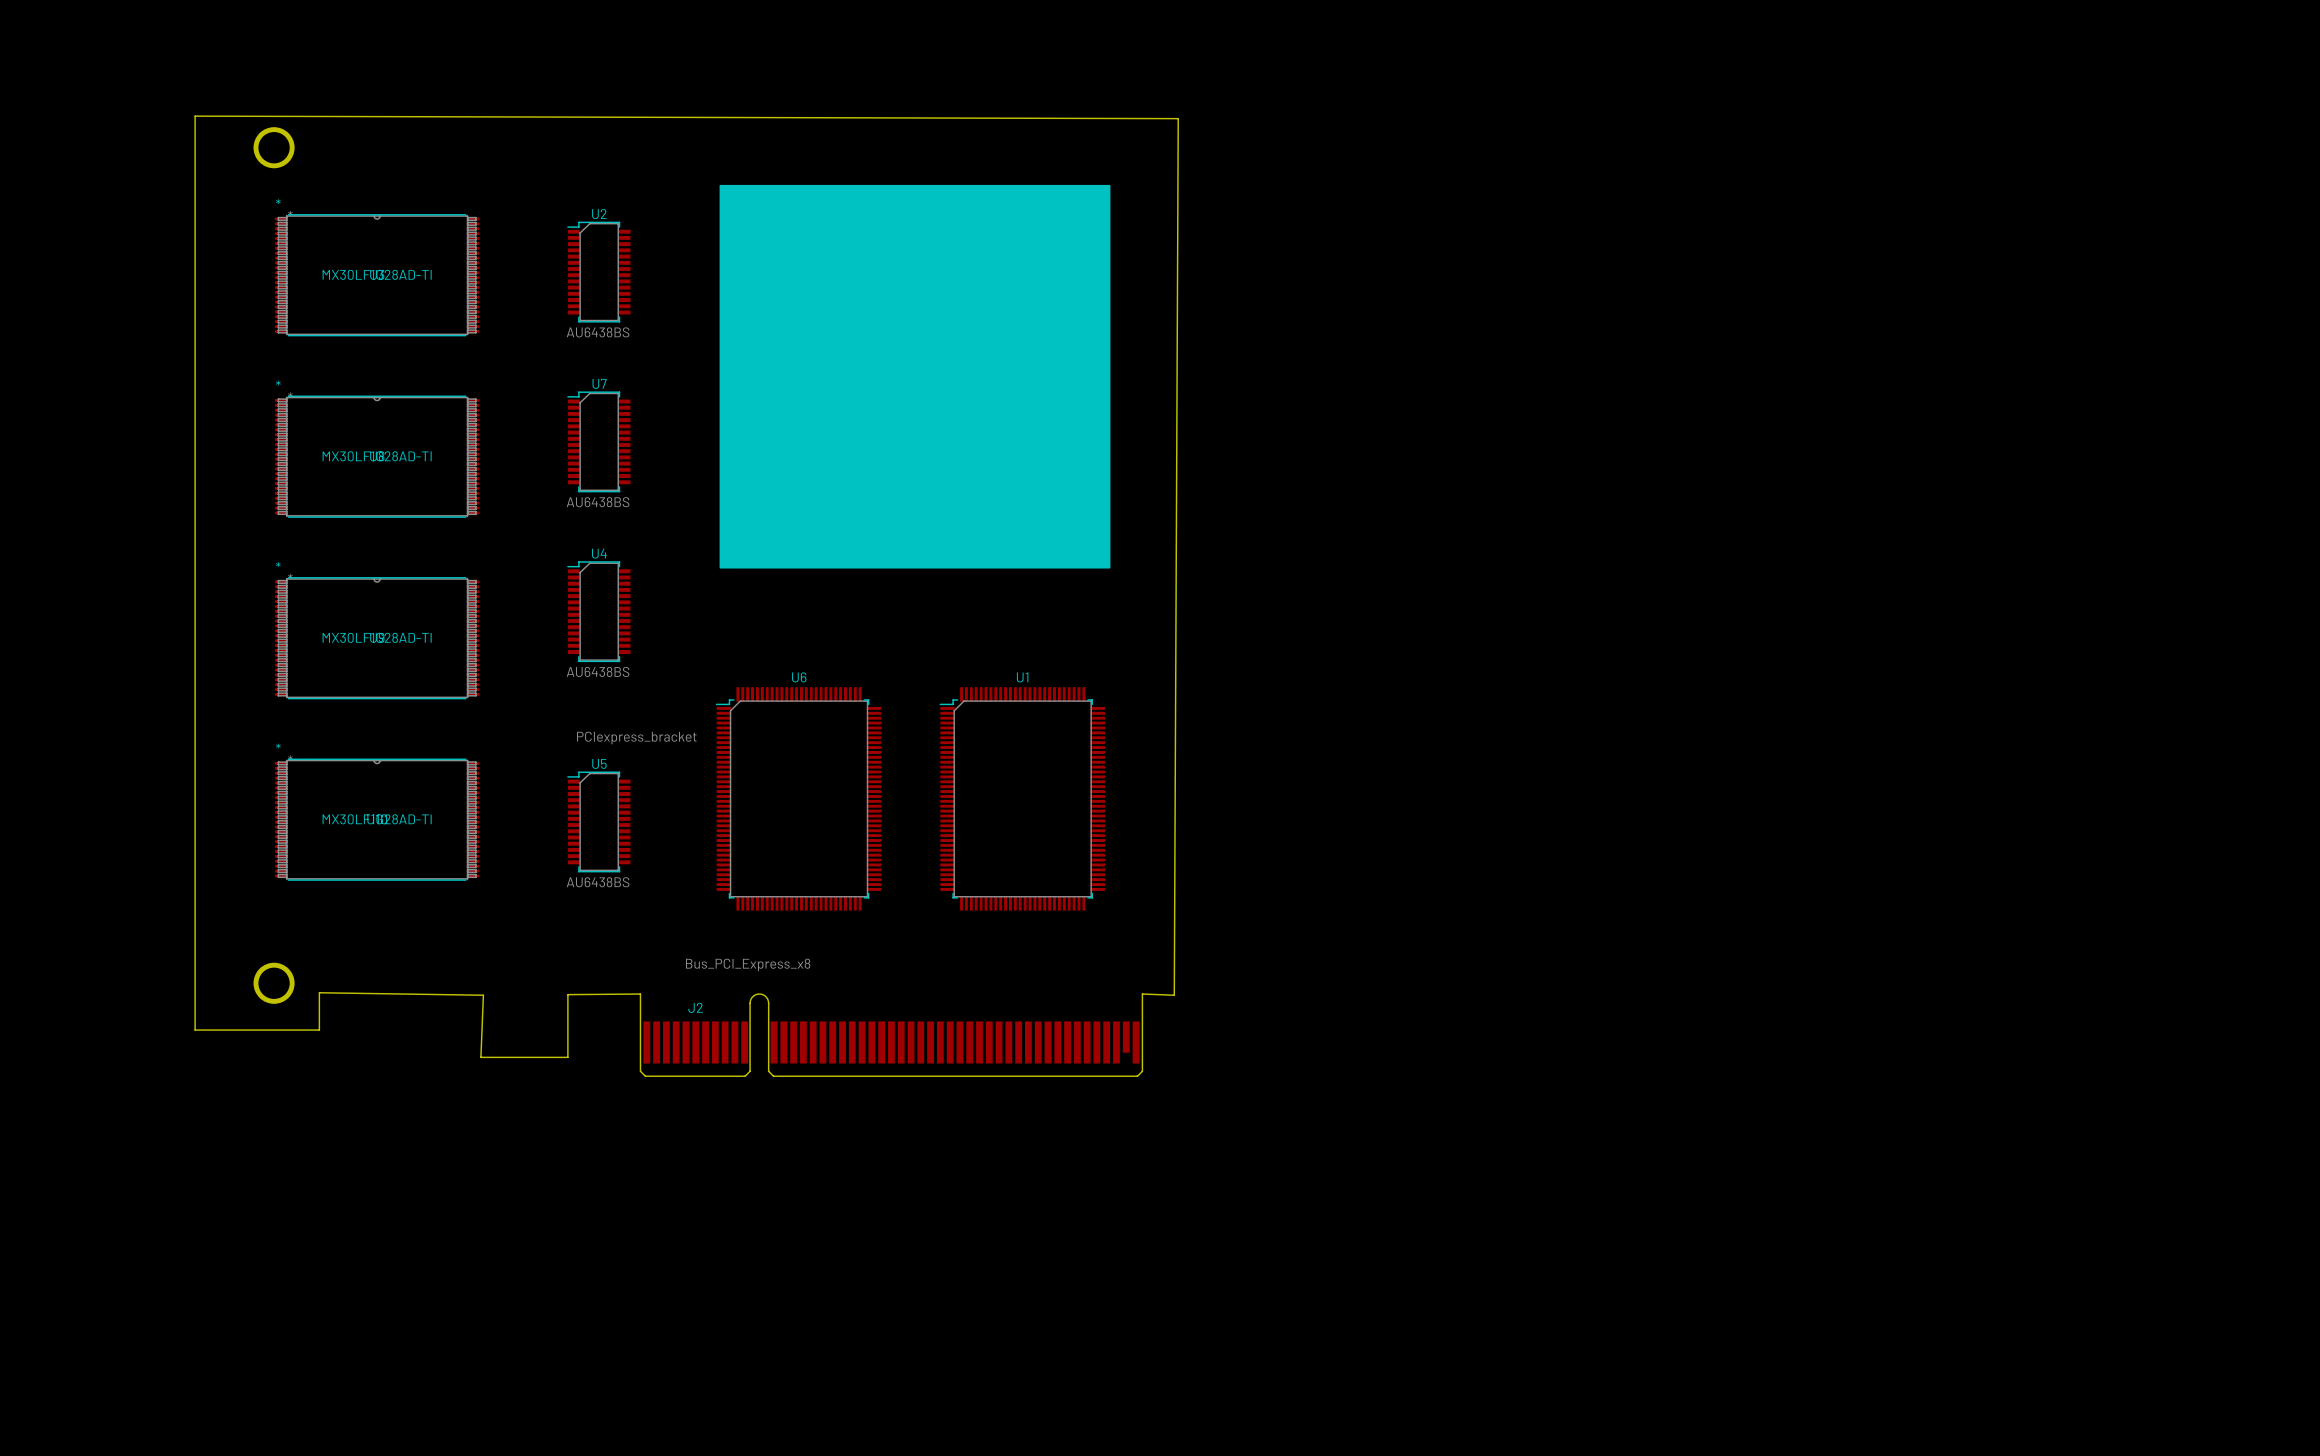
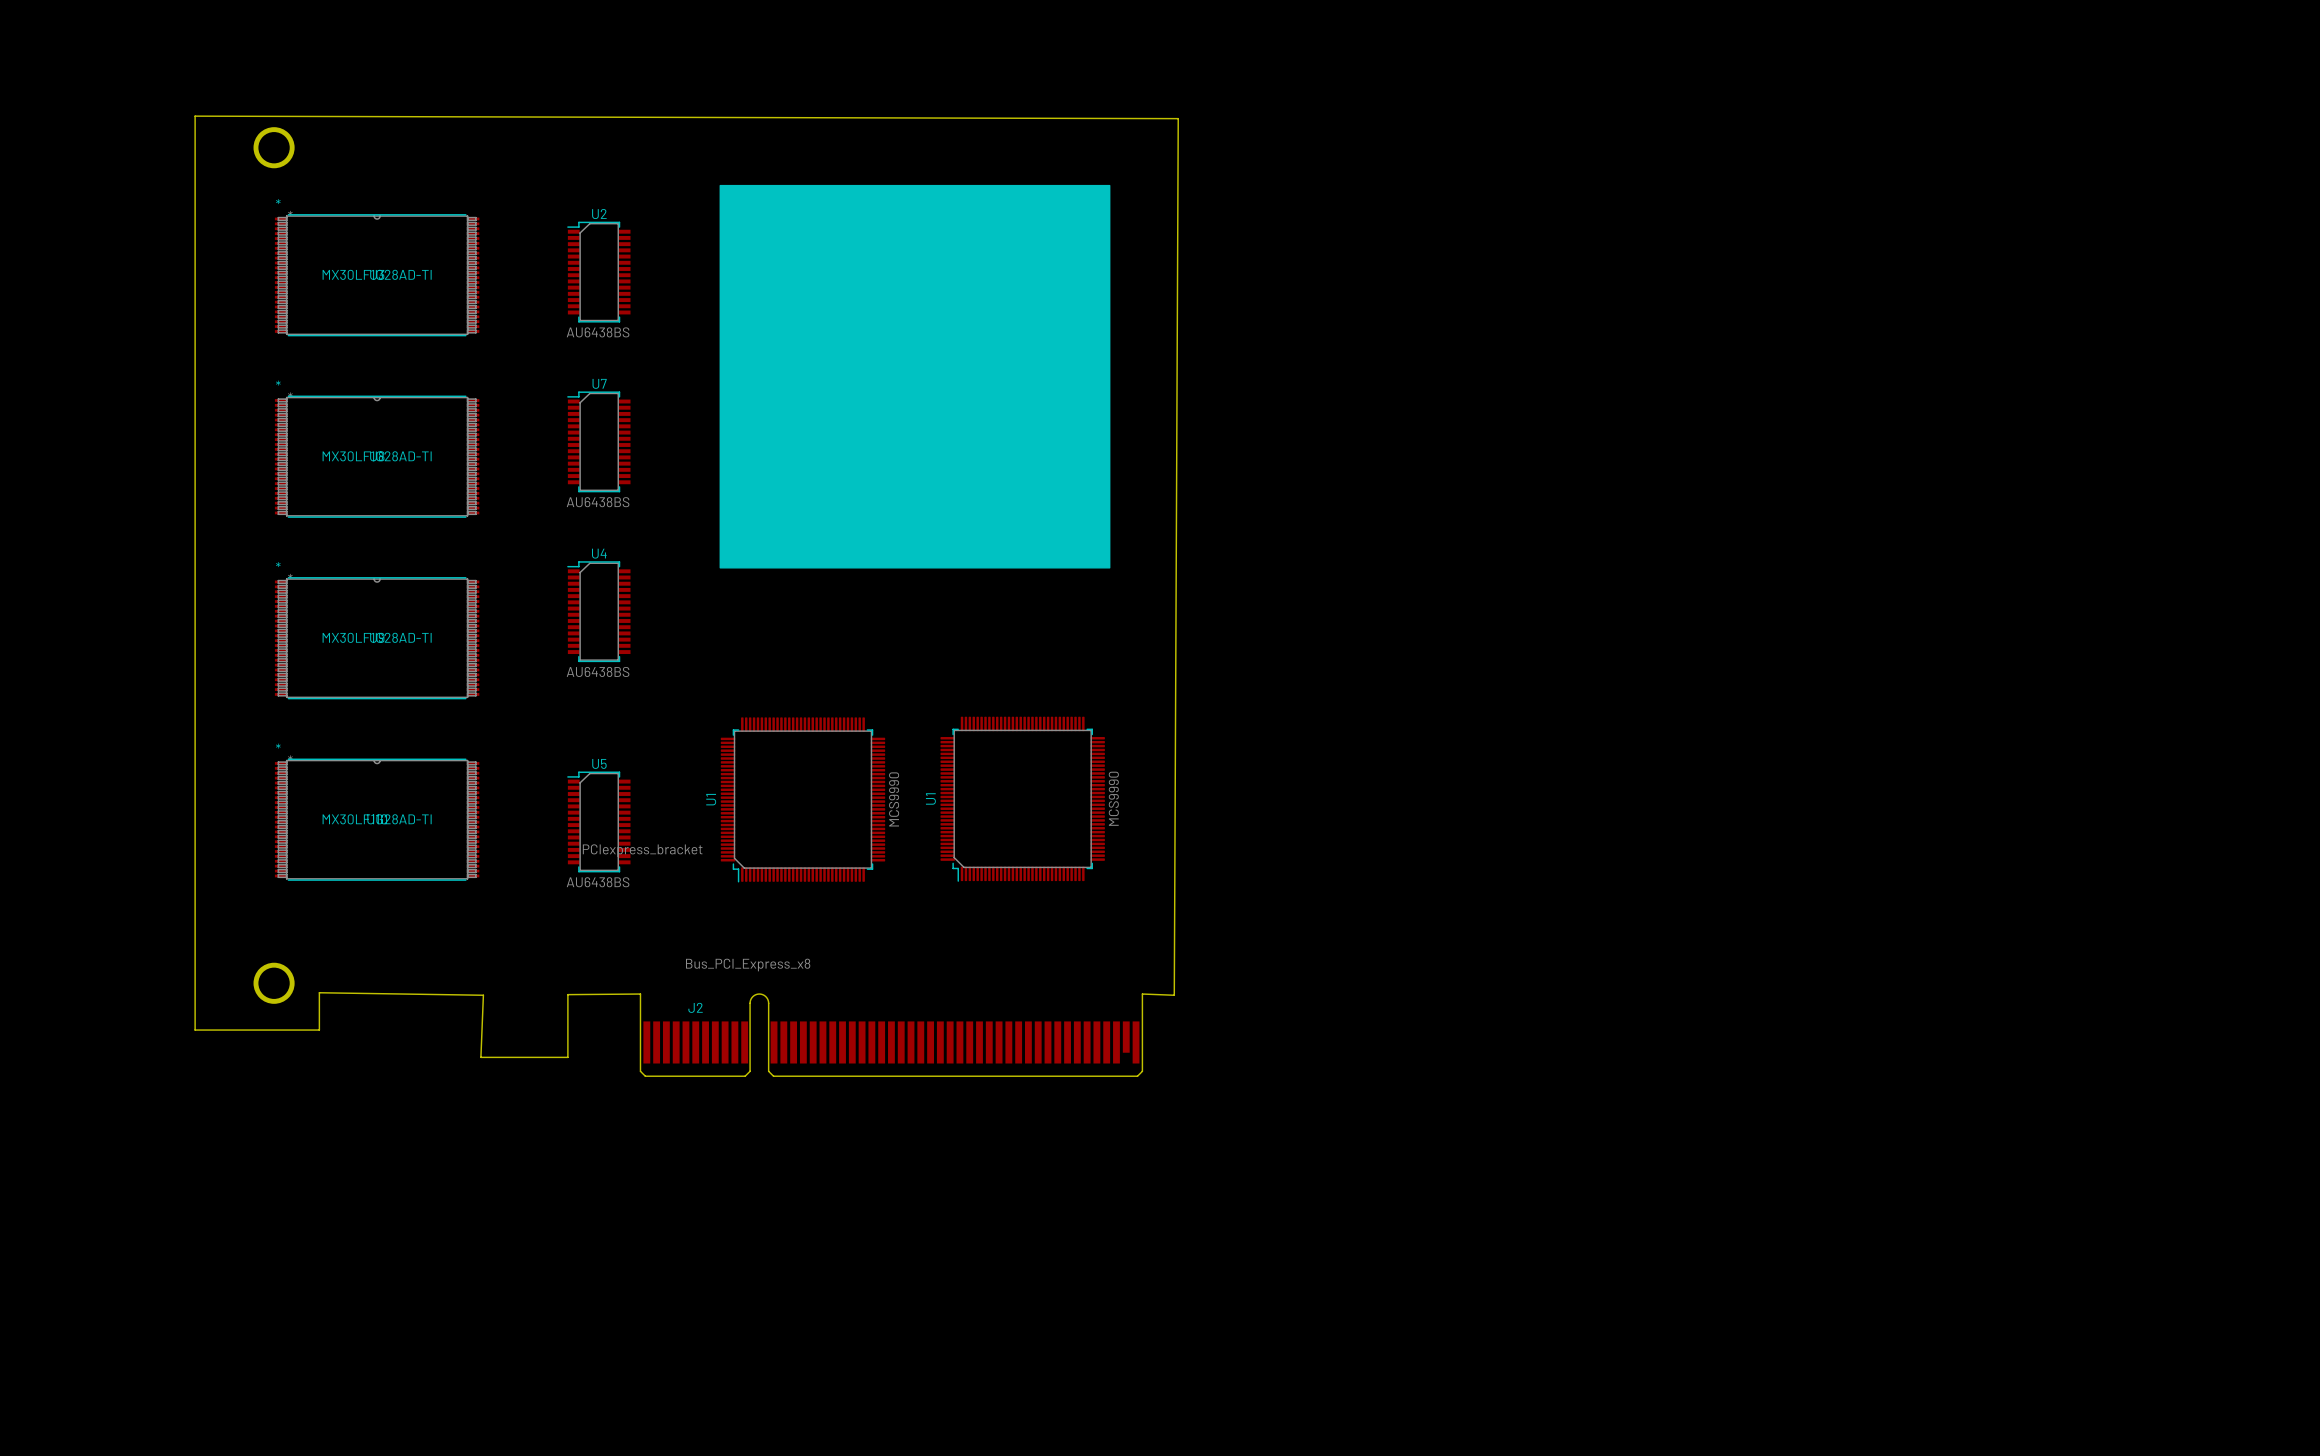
U1 name position: U1 (1022, 677) -> U1 (930, 798)
U1 footprint: [939, 687, 1106, 911] -> [940, 716, 1105, 882]
part value position: PCIexpress_bracket (636, 738) -> PCIexpress_bracket (642, 850)
U6: (798, 798) -> none
U1 value: none -> MCS9990 (1113, 798)
U1: none -> MCS9990 (802, 799)

